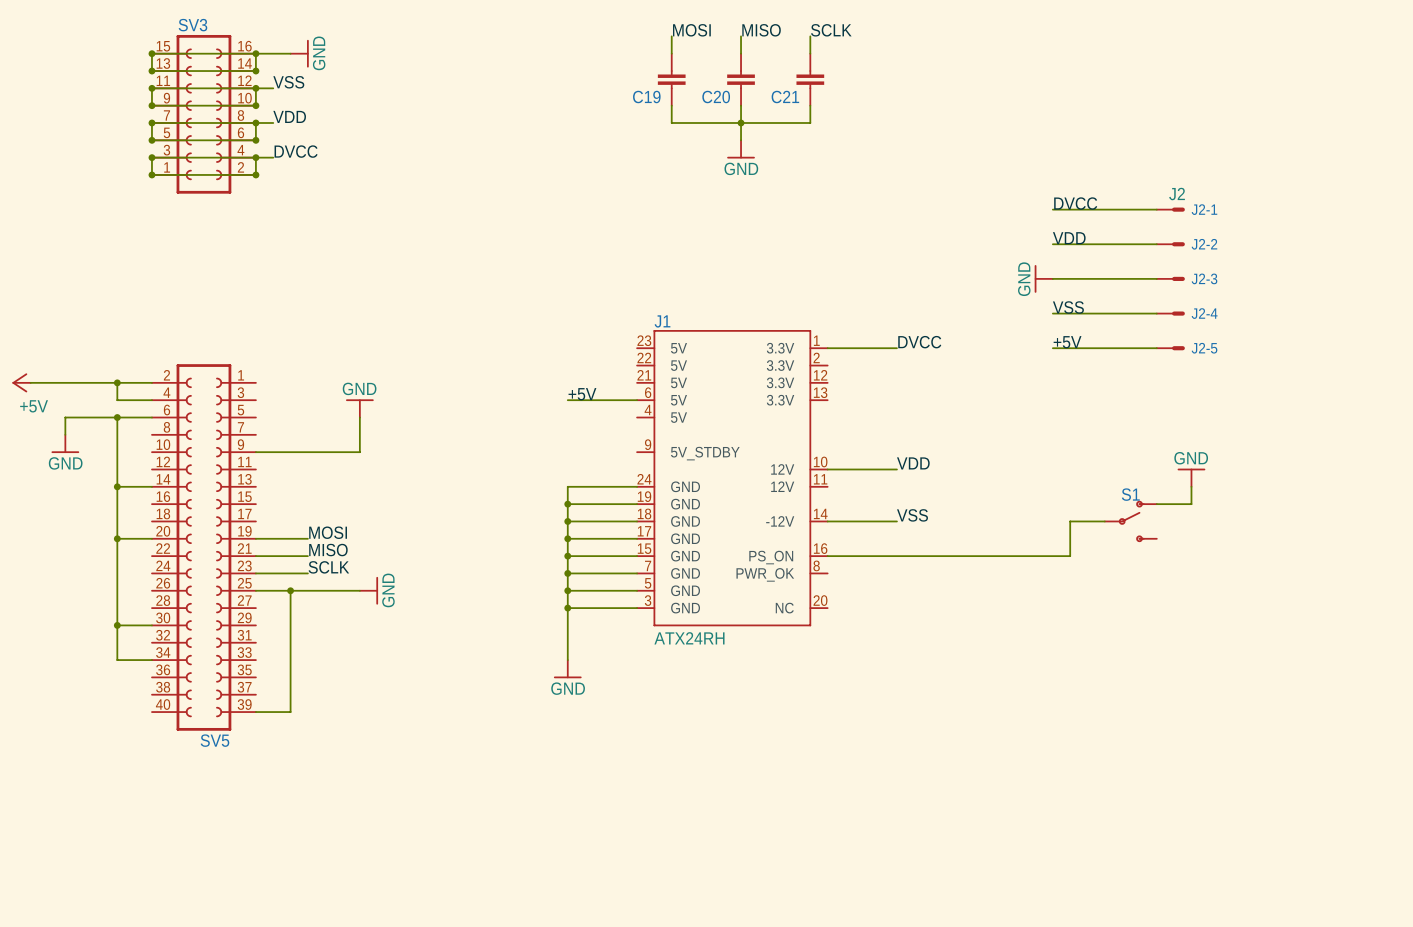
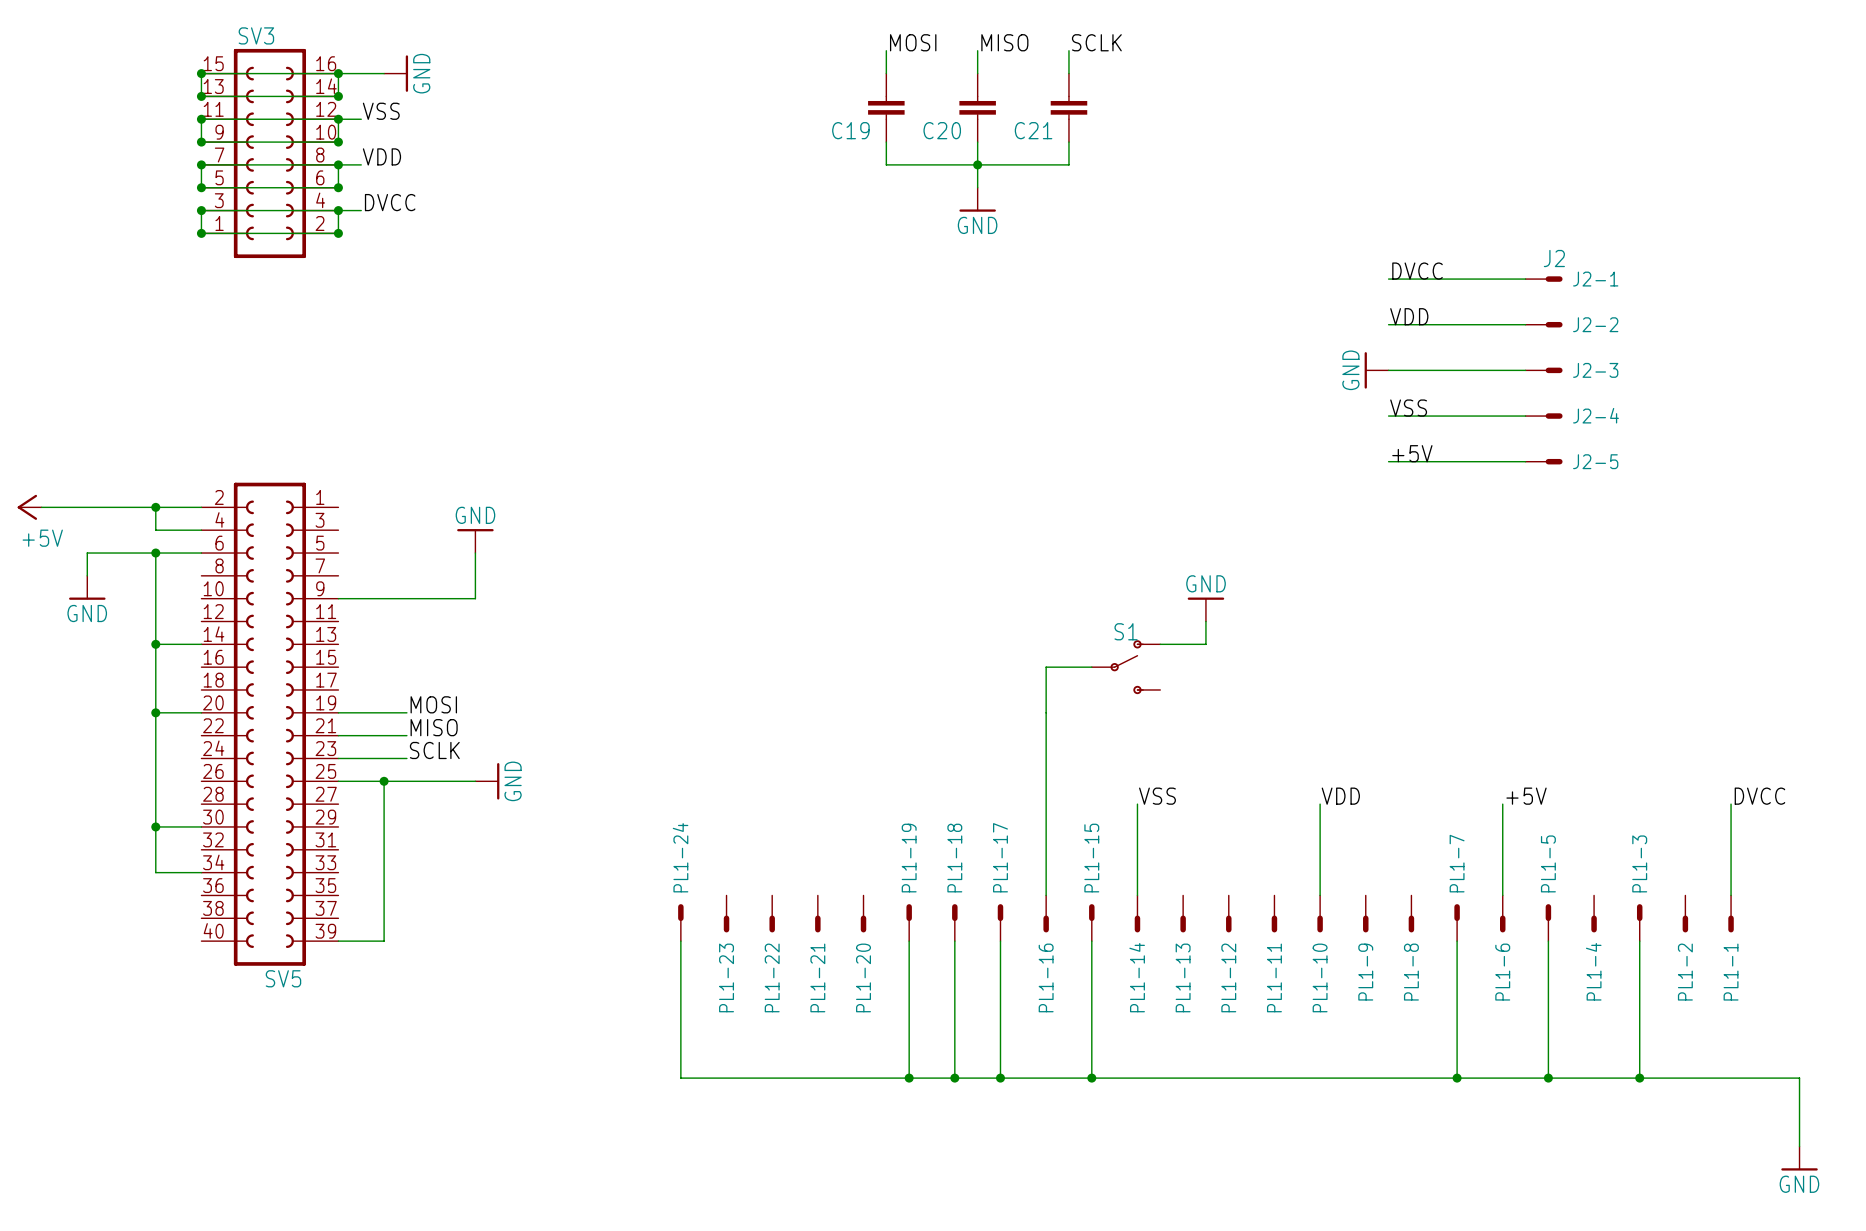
label: DVCC (919, 342) -> none
wire: (827, 348) (896, 348) -> none
label: +5V (582, 394) -> none
wire: (567, 400) (637, 400) -> none
power symbol: none -> GND (1205, 609)
label: VDD (913, 463) -> none
wire: (827, 469) (896, 469) -> none
wire: none -> (1205, 621) (1205, 644) (1160, 644)
power symbol: GND (1191, 477) -> none
J1: ATX24RH (732, 478) -> none
wire: (637, 486) (567, 486) (567, 660) -> none
wire: (1191, 486) (1191, 504) (1156, 504) -> none
wire: (567, 504) (637, 504) -> none
junction: (567, 504) -> none
wire: none -> (1091, 667) (1046, 667) (1046, 895)
label position: VSS (912, 515) -> VSS (1157, 796)
wire: (567, 521) (637, 521) -> none
junction: (567, 521) -> none
wire: (827, 521) (896, 521) -> none
wire: (1104, 521) (1070, 521) (1070, 556) (827, 556) -> none
S1 position: (1130, 521) -> (1126, 667)
wire: (567, 538) (637, 538) -> none
junction: (567, 538) -> none
wire: (567, 556) (637, 556) -> none
junction: (567, 556) -> none
wire: (567, 573) (637, 573) -> none
junction: (567, 573) -> none
wire: (567, 590) (637, 590) -> none
junction: (567, 590) -> none
label: none -> VDD (1340, 796)
label: none -> +5V (1526, 796)
label: none -> DVCC (1759, 796)
wire: (567, 608) (637, 608) -> none
junction: (567, 608) -> none
wire: none -> (1137, 804) (1137, 895)
wire: none -> (1320, 804) (1320, 895)
wire: none -> (1502, 804) (1502, 895)
wire: none -> (1731, 804) (1731, 895)
power symbol: GND (567, 669) -> none
PL1-23: none -> (726, 913)
PL1-22: none -> (772, 913)
PL1-21: none -> (817, 913)
PL1-20: none -> (863, 913)
PL1-16: none -> (1046, 913)
PL1-14: none -> (1137, 913)
PL1-13: none -> (1183, 913)
PL1-12: none -> (1228, 913)
PL1-11: none -> (1274, 913)
PL1-10: none -> (1320, 913)
PL1-9: none -> (1365, 913)
PL1-8: none -> (1411, 913)
PL1-6: none -> (1502, 913)
PL1-4: none -> (1594, 913)
PL1-2: none -> (1685, 913)
PL1-1: none -> (1731, 913)
PL1-24: none -> (680, 922)
PL1-19: none -> (909, 922)
PL1-18: none -> (954, 922)
PL1-17: none -> (1000, 922)
PL1-15: none -> (1091, 922)
PL1-7: none -> (1457, 922)
PL1-5: none -> (1548, 922)
PL1-3: none -> (1639, 922)
wire: none -> (680, 941) (680, 1078) (1799, 1078) (1799, 1146)
wire: none -> (909, 941) (909, 1078)
wire: none -> (954, 941) (954, 1078)
wire: none -> (1000, 941) (1000, 1078)
wire: none -> (1091, 941) (1091, 1078)
wire: none -> (1457, 941) (1457, 1078)
wire: none -> (1548, 941) (1548, 1078)
wire: none -> (1639, 941) (1639, 1078)
junction: none -> (909, 1078)
junction: none -> (954, 1078)
junction: none -> (1000, 1078)
junction: none -> (1091, 1078)
junction: none -> (1457, 1078)
junction: none -> (1548, 1078)
junction: none -> (1639, 1078)
power symbol: none -> GND (1799, 1158)

